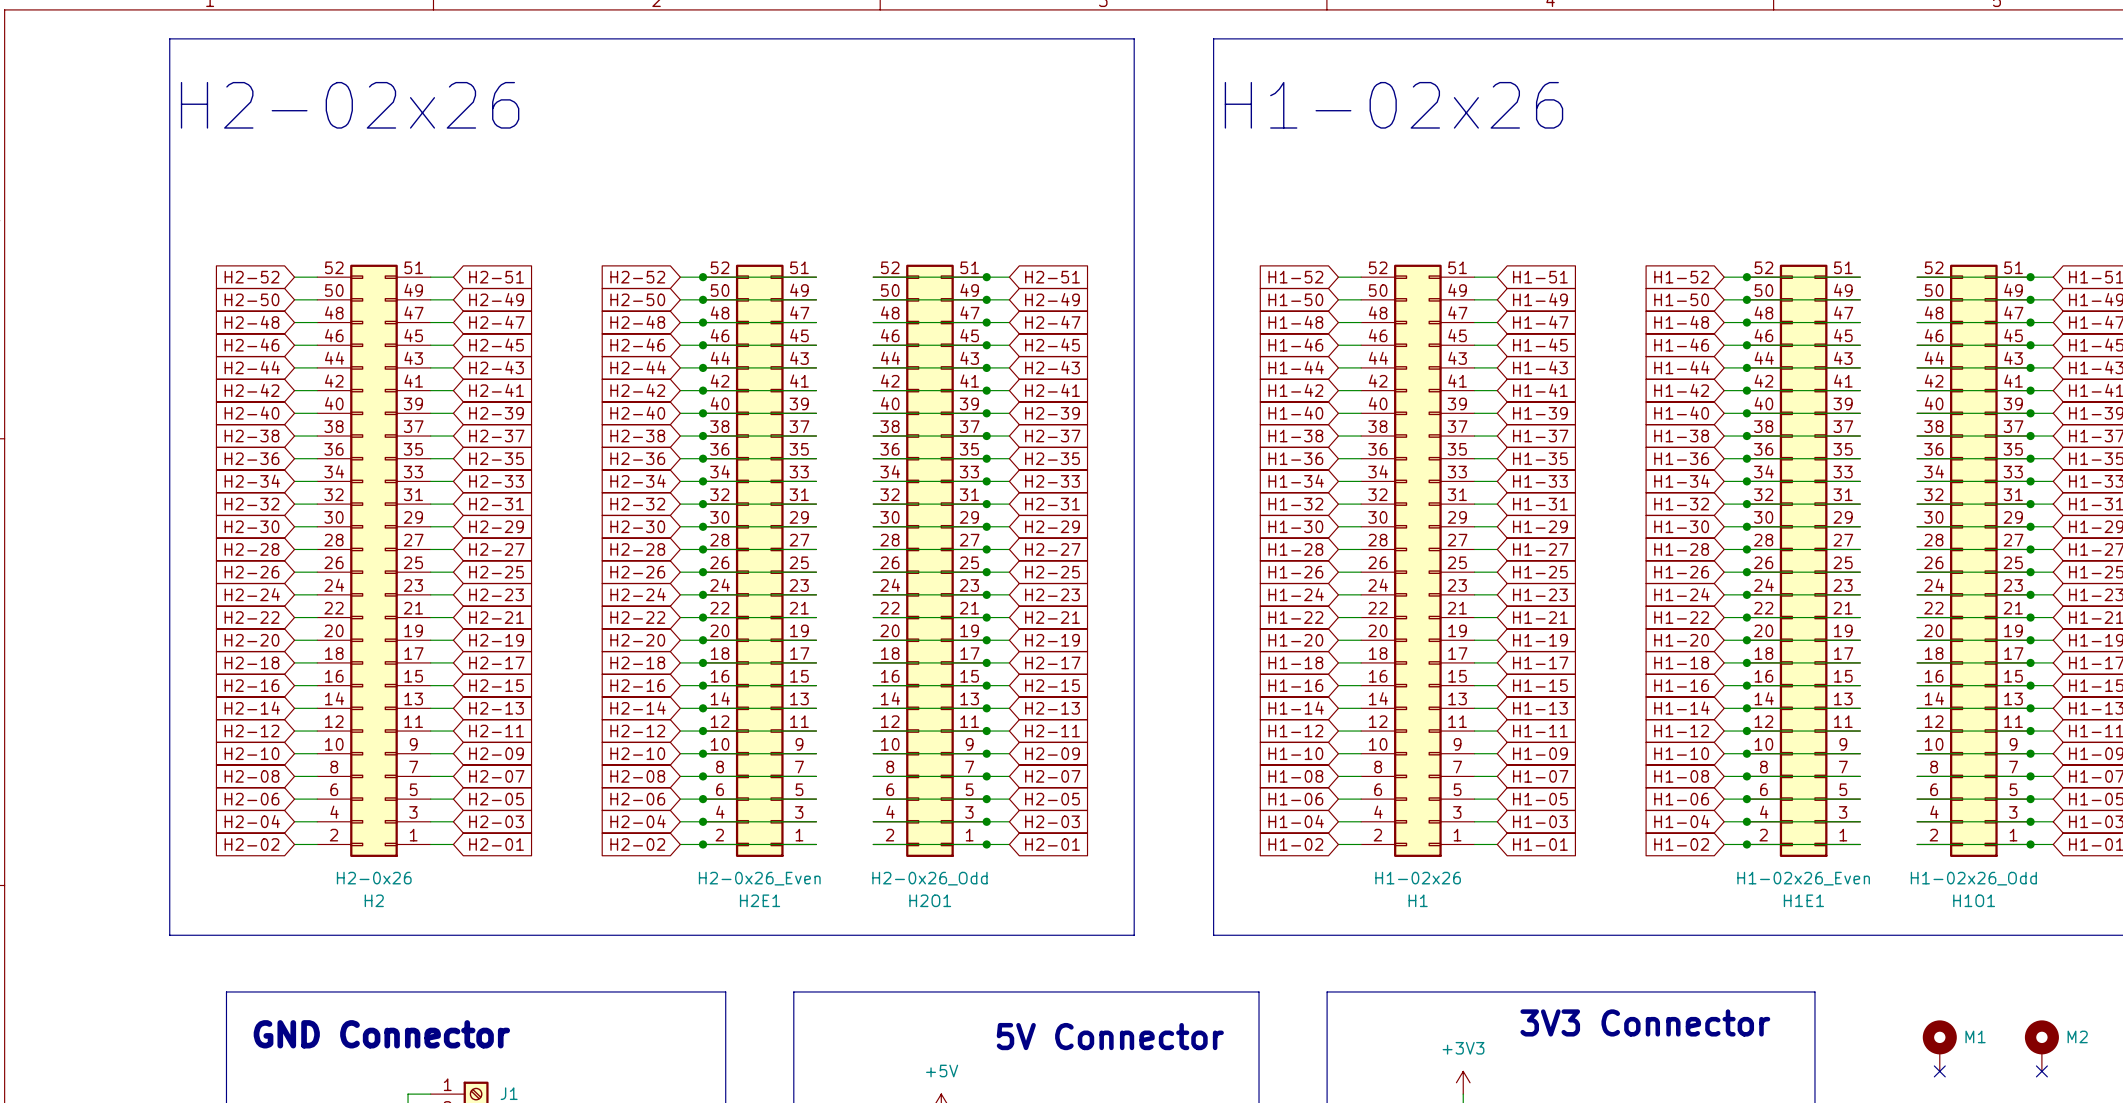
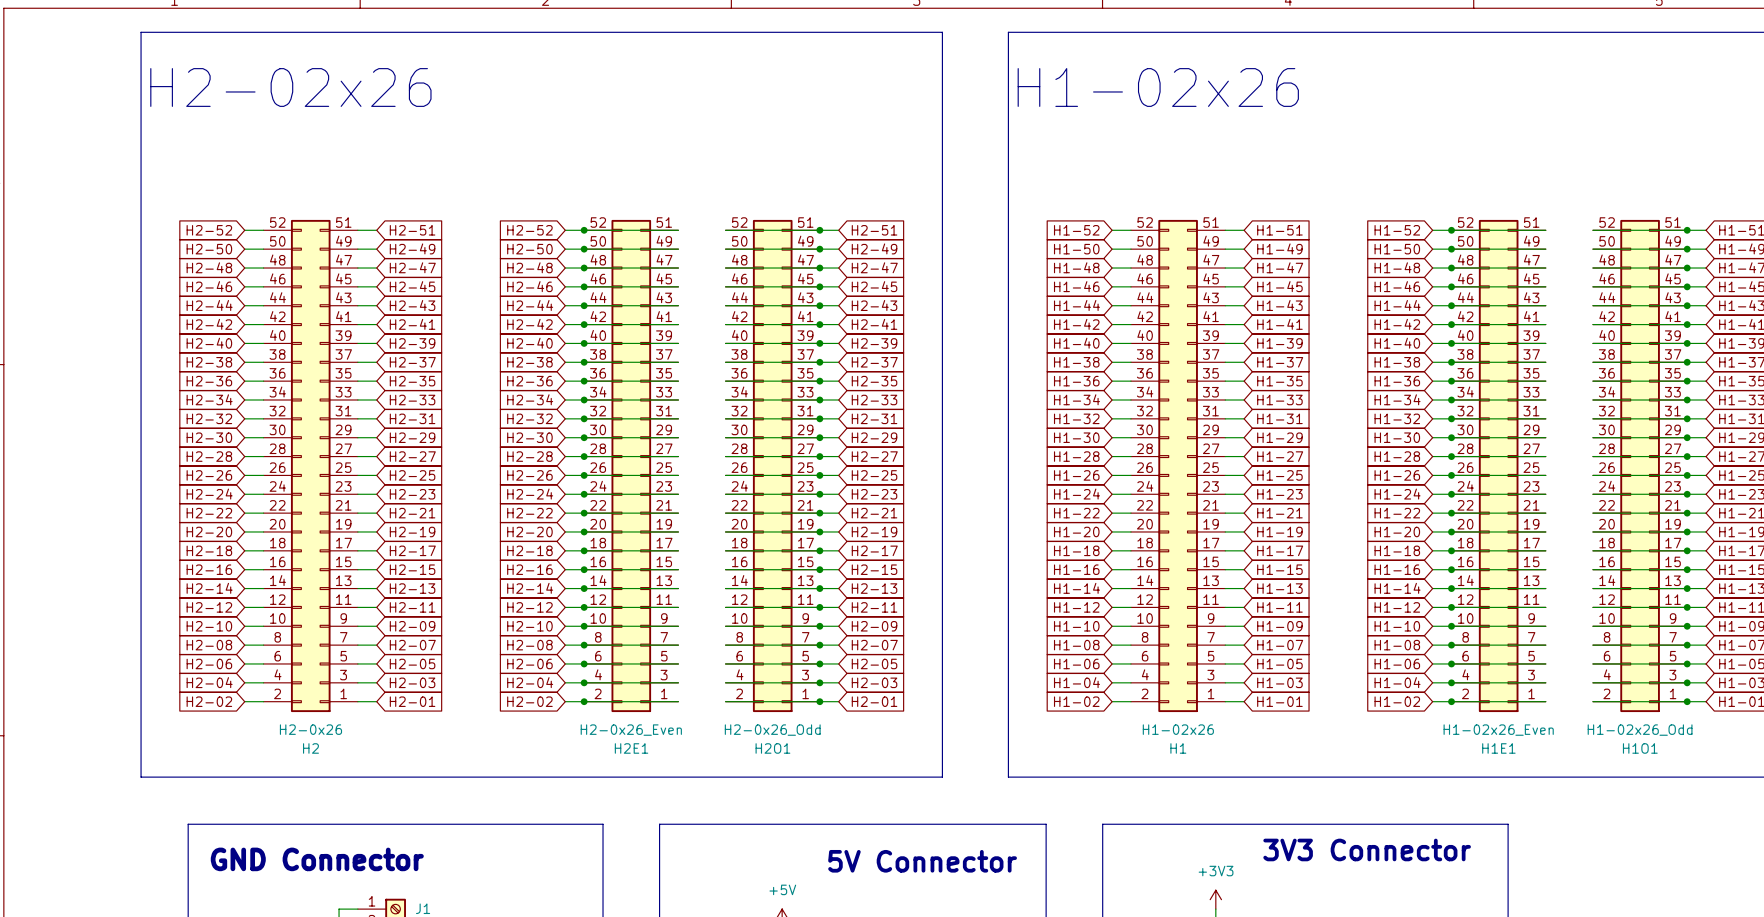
M1: (1939, 1045) -> none
M2: (2041, 1045) -> none
no-connect mark: (1939, 1071) -> none
no-connect mark: (2041, 1071) -> none

